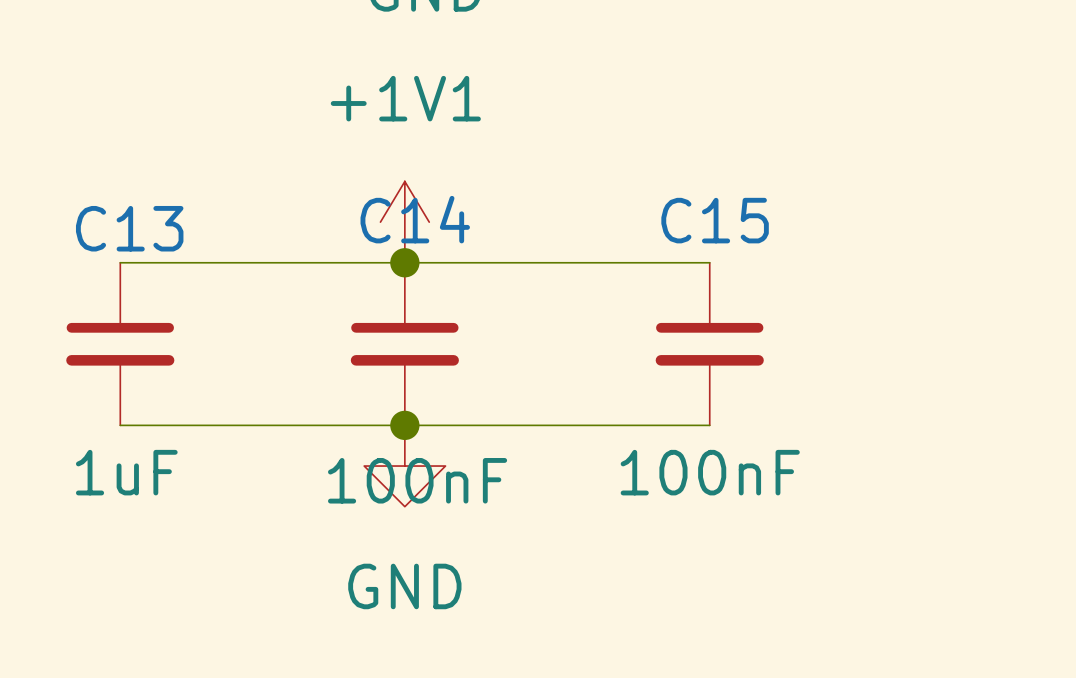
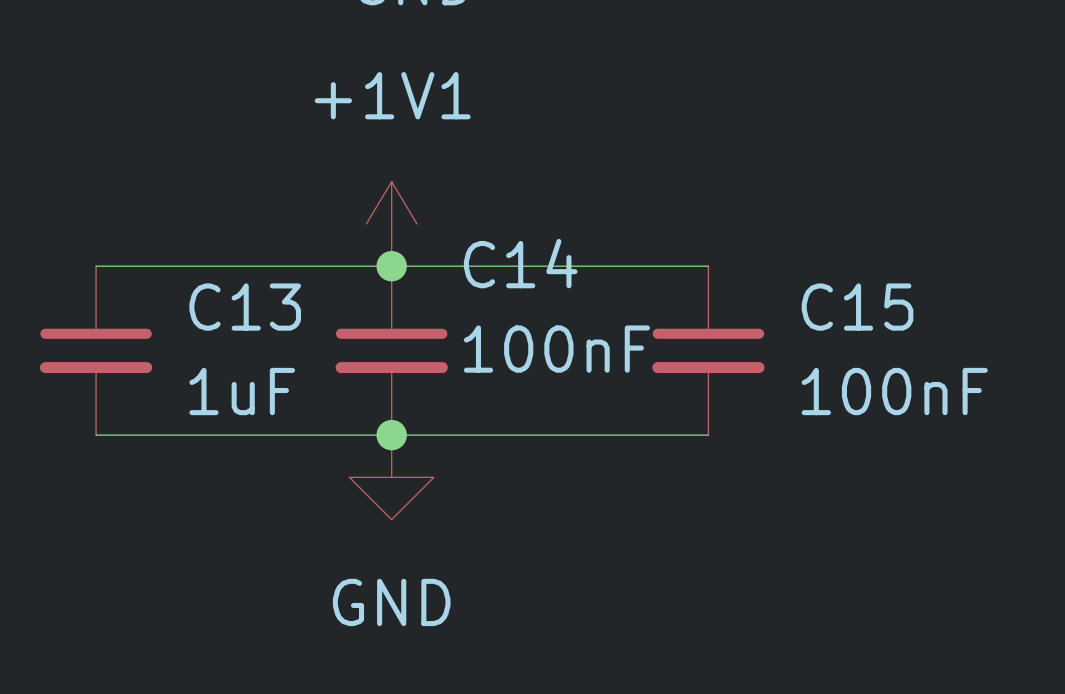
C14 name position: C14 (415, 219) -> C14 (520, 263)
C15 name position: C15 (715, 220) -> C15 (857, 307)
C13 name position: C13 (129, 228) -> C13 (245, 307)
C13 value position: 1uF (126, 472) -> 1uF (242, 391)
C15 value position: 100nF (710, 472) -> 100nF (894, 391)
C14 value position: 100nF (417, 480) -> 100nF (556, 349)

